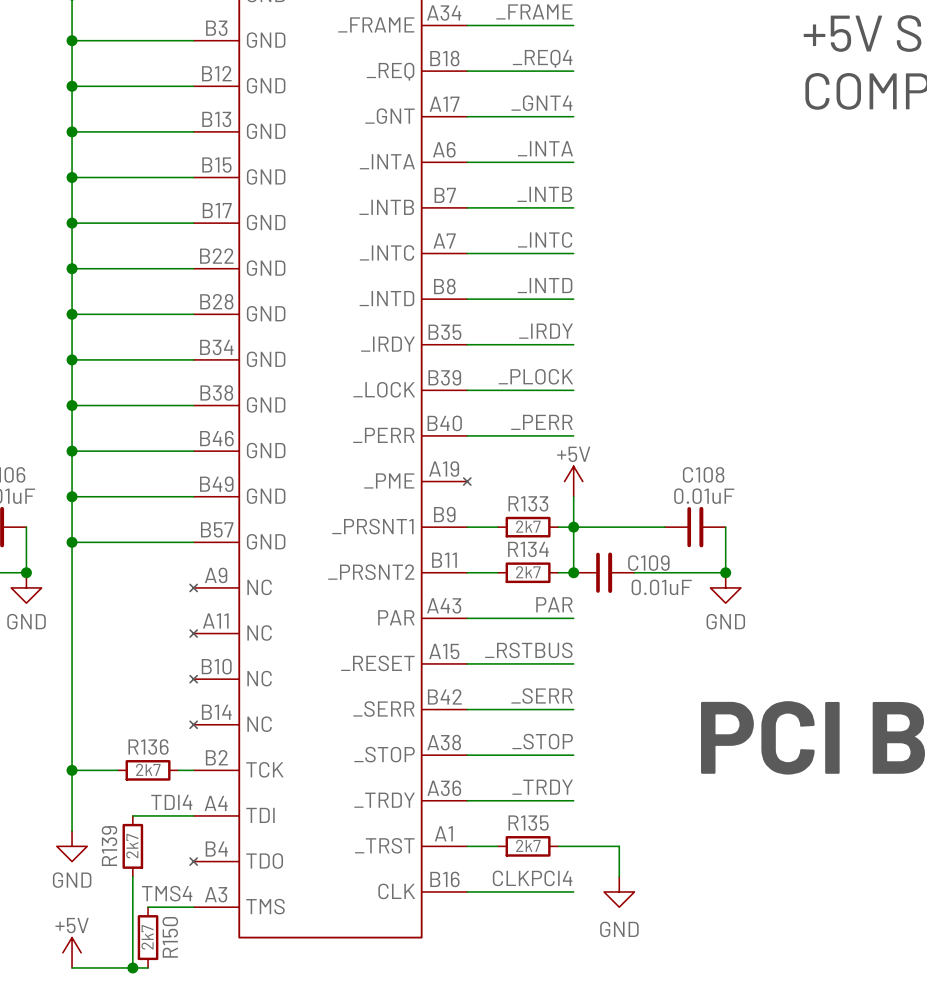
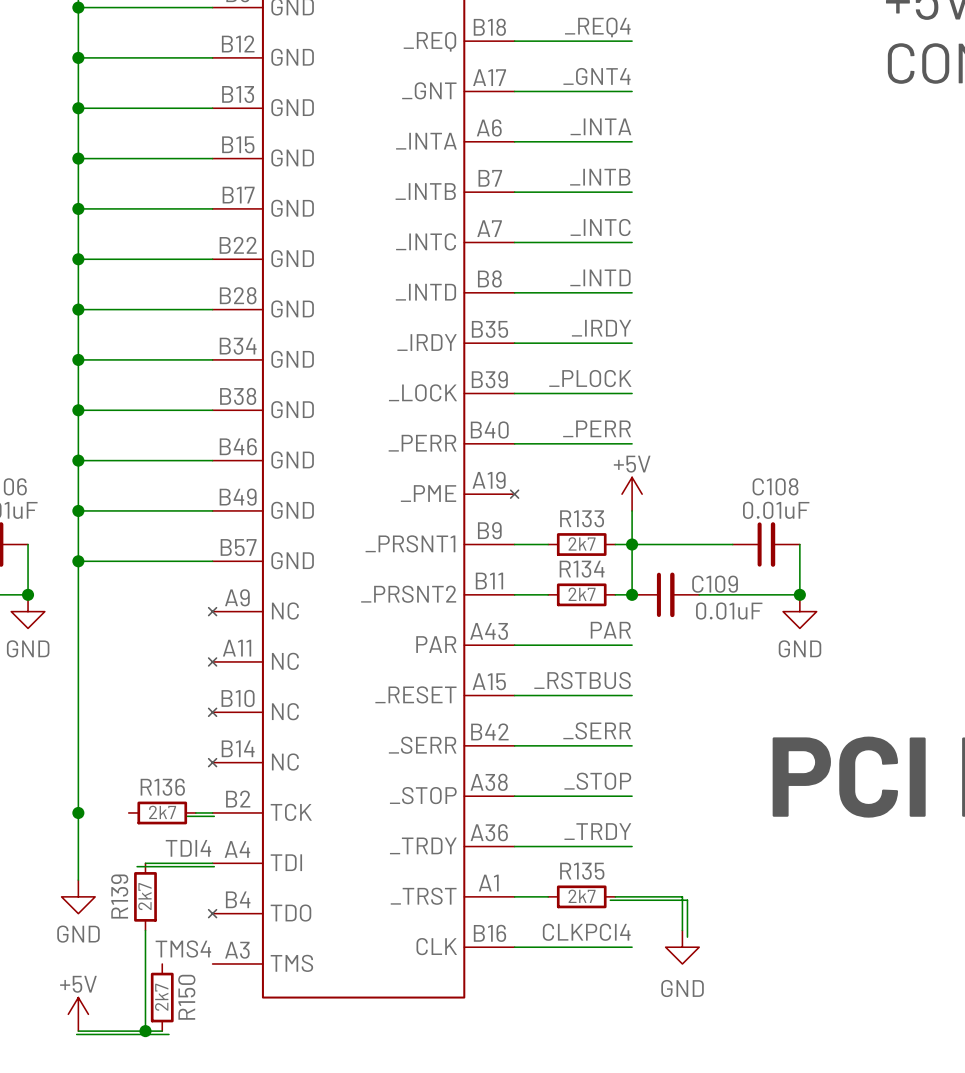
wire: (72, 770) (117, 770) -> none
wire: none -> (187, 816) (214, 816)
wire: none -> (137, 866) (214, 866)
wire: none -> (610, 900) (687, 900) (687, 937)
wire: (148, 907) (193, 907) -> none
wire: none -> (76, 1034) (168, 1034)

